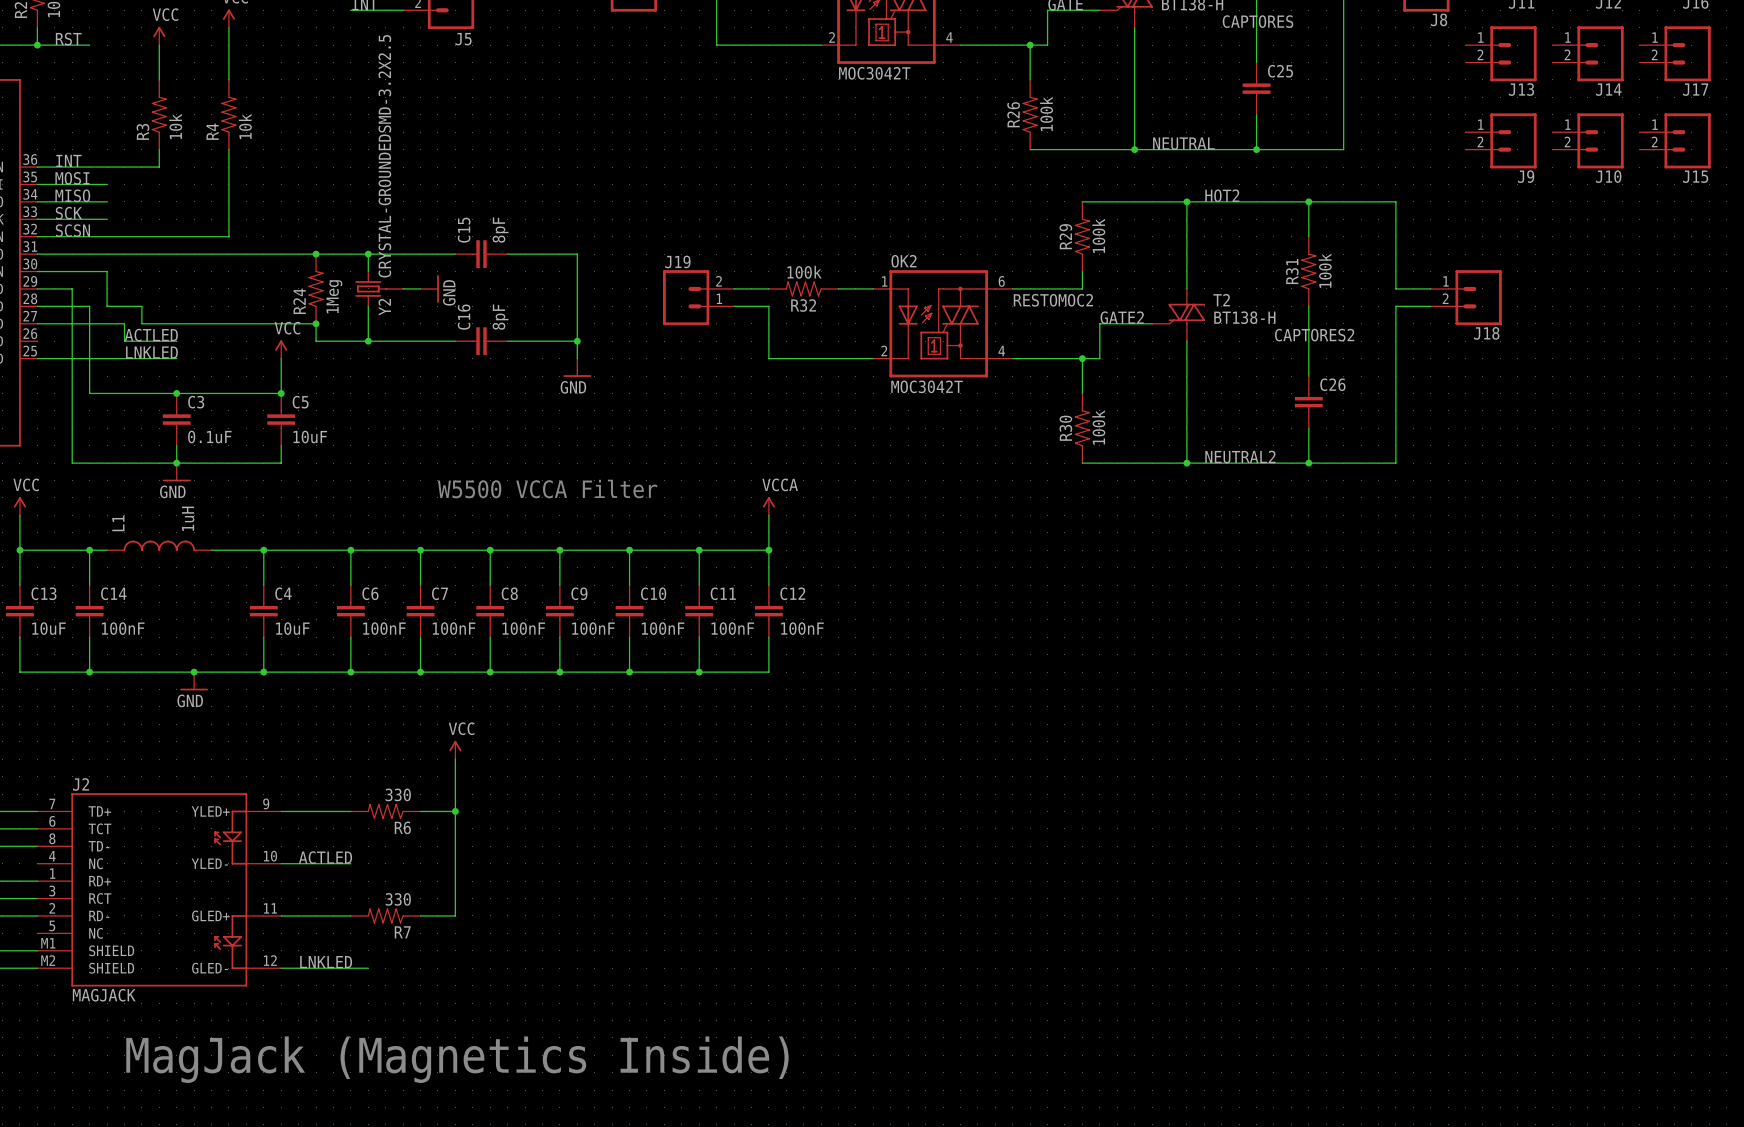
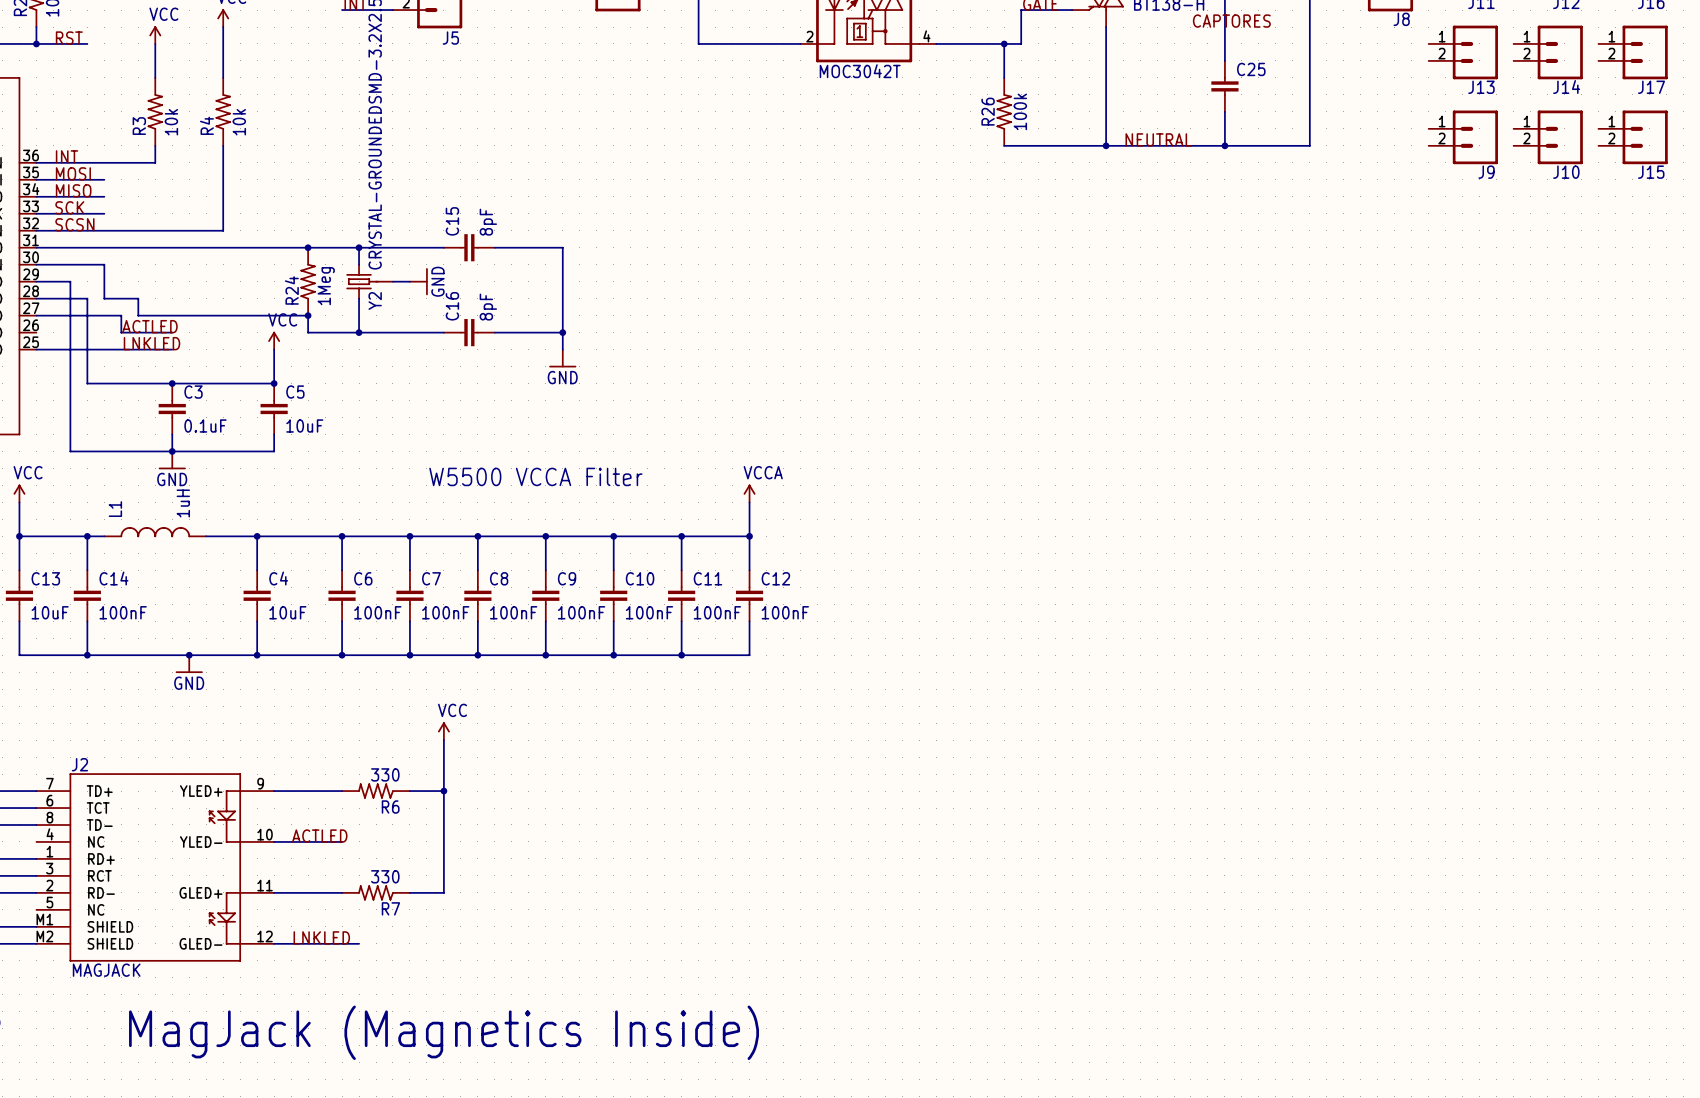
label: HOT2 (1222, 195) -> none
wire: (1082, 201) (1395, 201) (1395, 288) (1430, 288) -> none
wire: (1186, 201) (1186, 288) -> none
junction: (1186, 201) -> none
wire: (1308, 201) (1308, 236) -> none
junction: (1308, 201) -> none
R29: 100k (1082, 236) -> none
wire: (1082, 271) (1082, 288) (1012, 288) -> none
R31: 100k (1308, 271) -> none
wire: (734, 288) (768, 288) -> none
R32: 100k (803, 288) -> none
wire: (838, 288) (873, 288) -> none
J19: (698, 297) -> none
J18: (1466, 297) -> none
label: RESTOMOC2 (1053, 300) -> none
wire: (734, 306) (768, 306) (768, 358) (873, 358) -> none
wire: (1308, 306) (1308, 376) -> none
wire: (1430, 306) (1395, 306) (1395, 463) (1082, 463) -> none
T2: BT138-H (1178, 315) -> none
label: GATE2 (1122, 317) -> none
OK2: MOC3042T (943, 323) -> none
wire: (1152, 323) (1099, 323) (1099, 358) (1012, 358) -> none
label: CAPTORES2 (1314, 335) -> none
wire: (1186, 341) (1186, 463) -> none
wire: (1082, 358) (1082, 393) -> none
junction: (1082, 358) -> none
C26: (1308, 402) -> none
R30: 100k (1082, 428) -> none
wire: (1308, 428) (1308, 463) -> none
label: NEUTRAL2 (1240, 457) -> none
junction: (1186, 463) -> none
junction: (1308, 463) -> none

